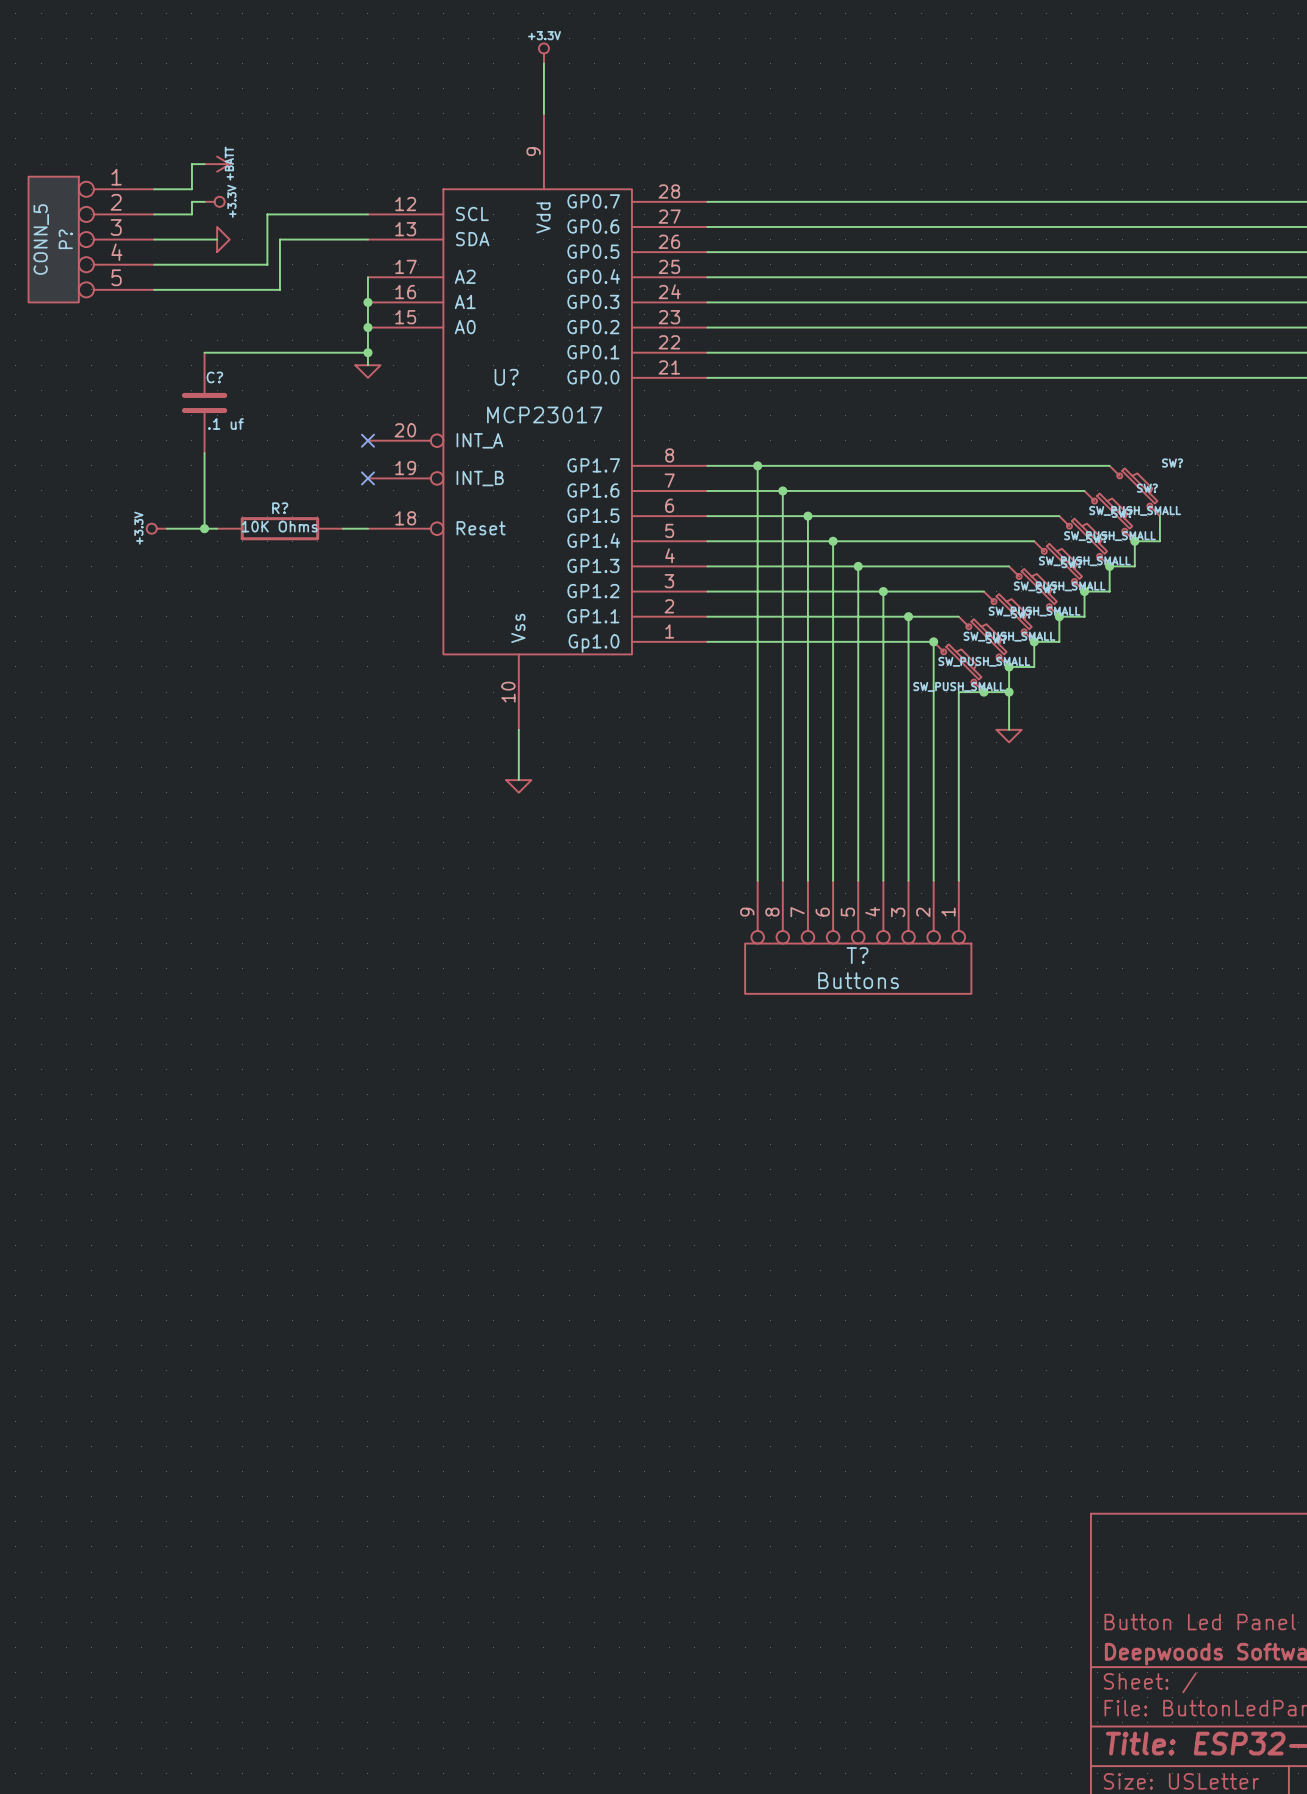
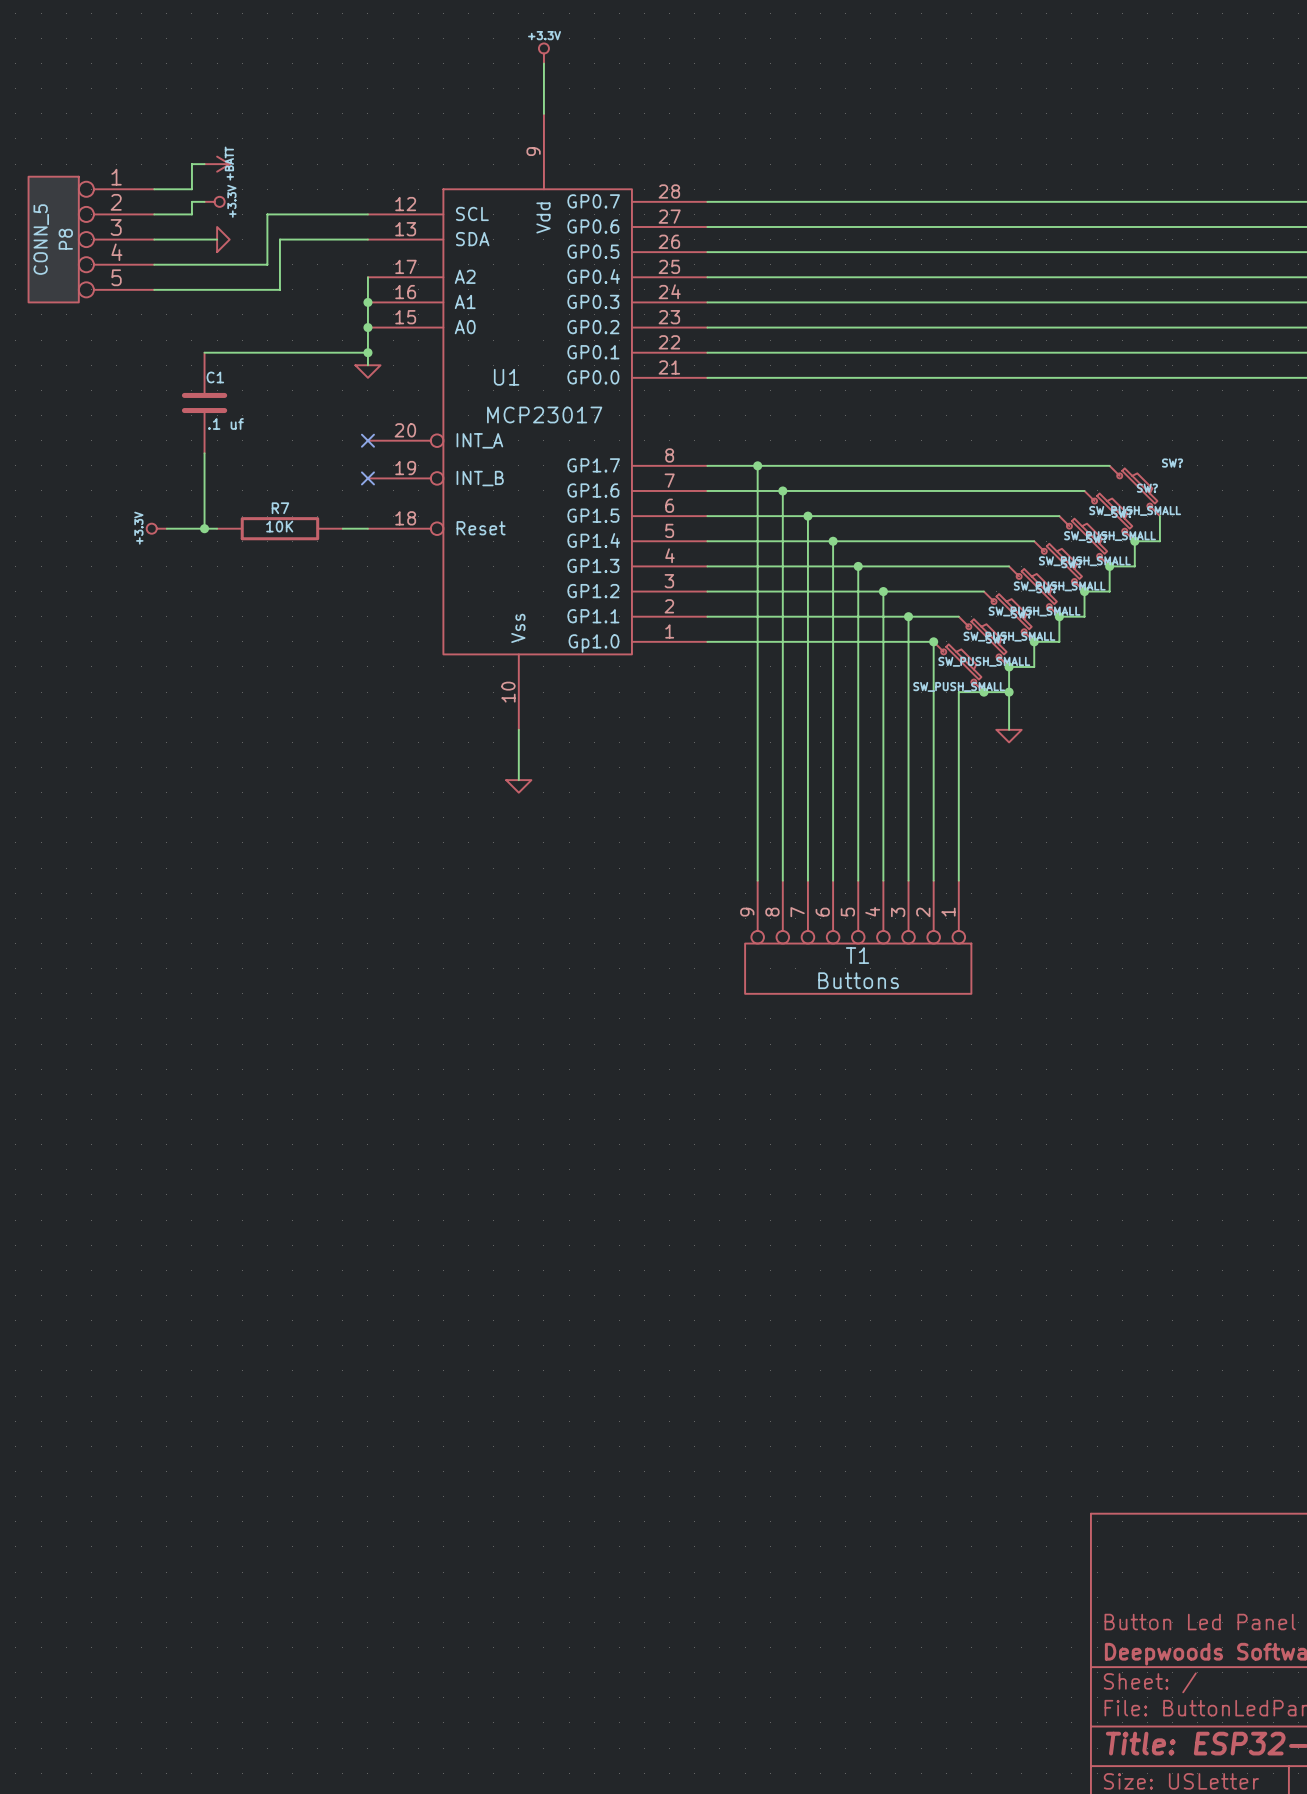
P? name: P? (65, 239) -> P8 (65, 239)
C? name: C? (214, 377) -> C1 (215, 377)
U? name: U? (506, 377) -> U1 (506, 377)
R? name: R? (280, 508) -> R7 (280, 508)
R? value: 10K Ohms (279, 526) -> 10K (279, 526)
T? name: T? (857, 955) -> T1 (857, 955)

